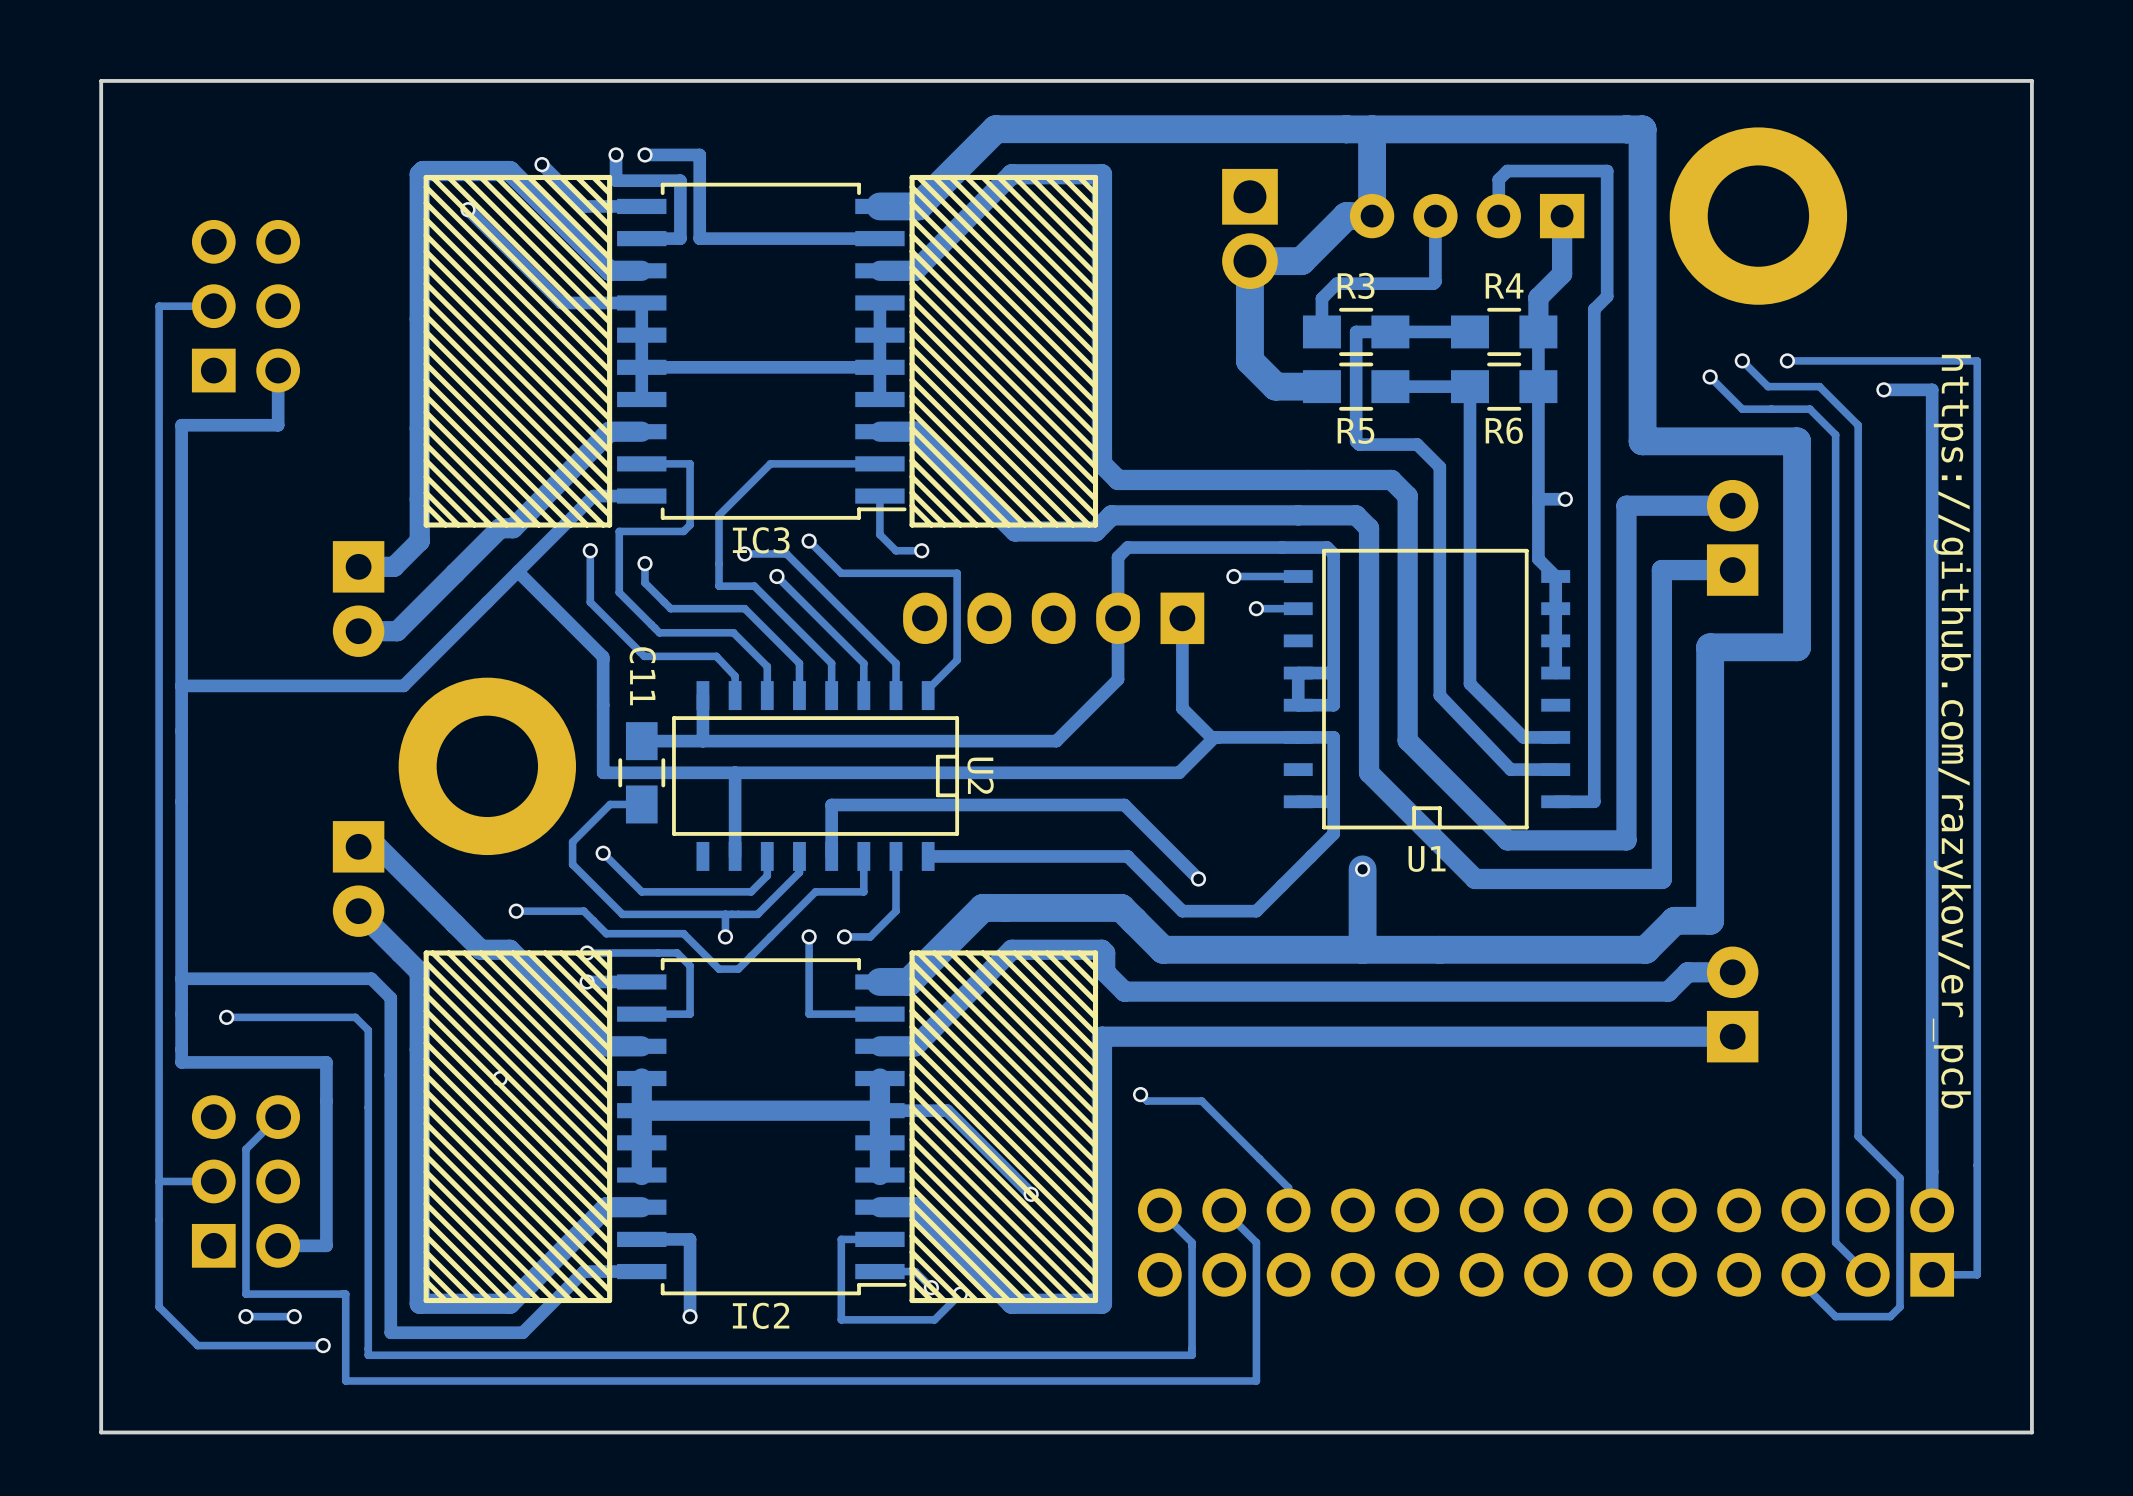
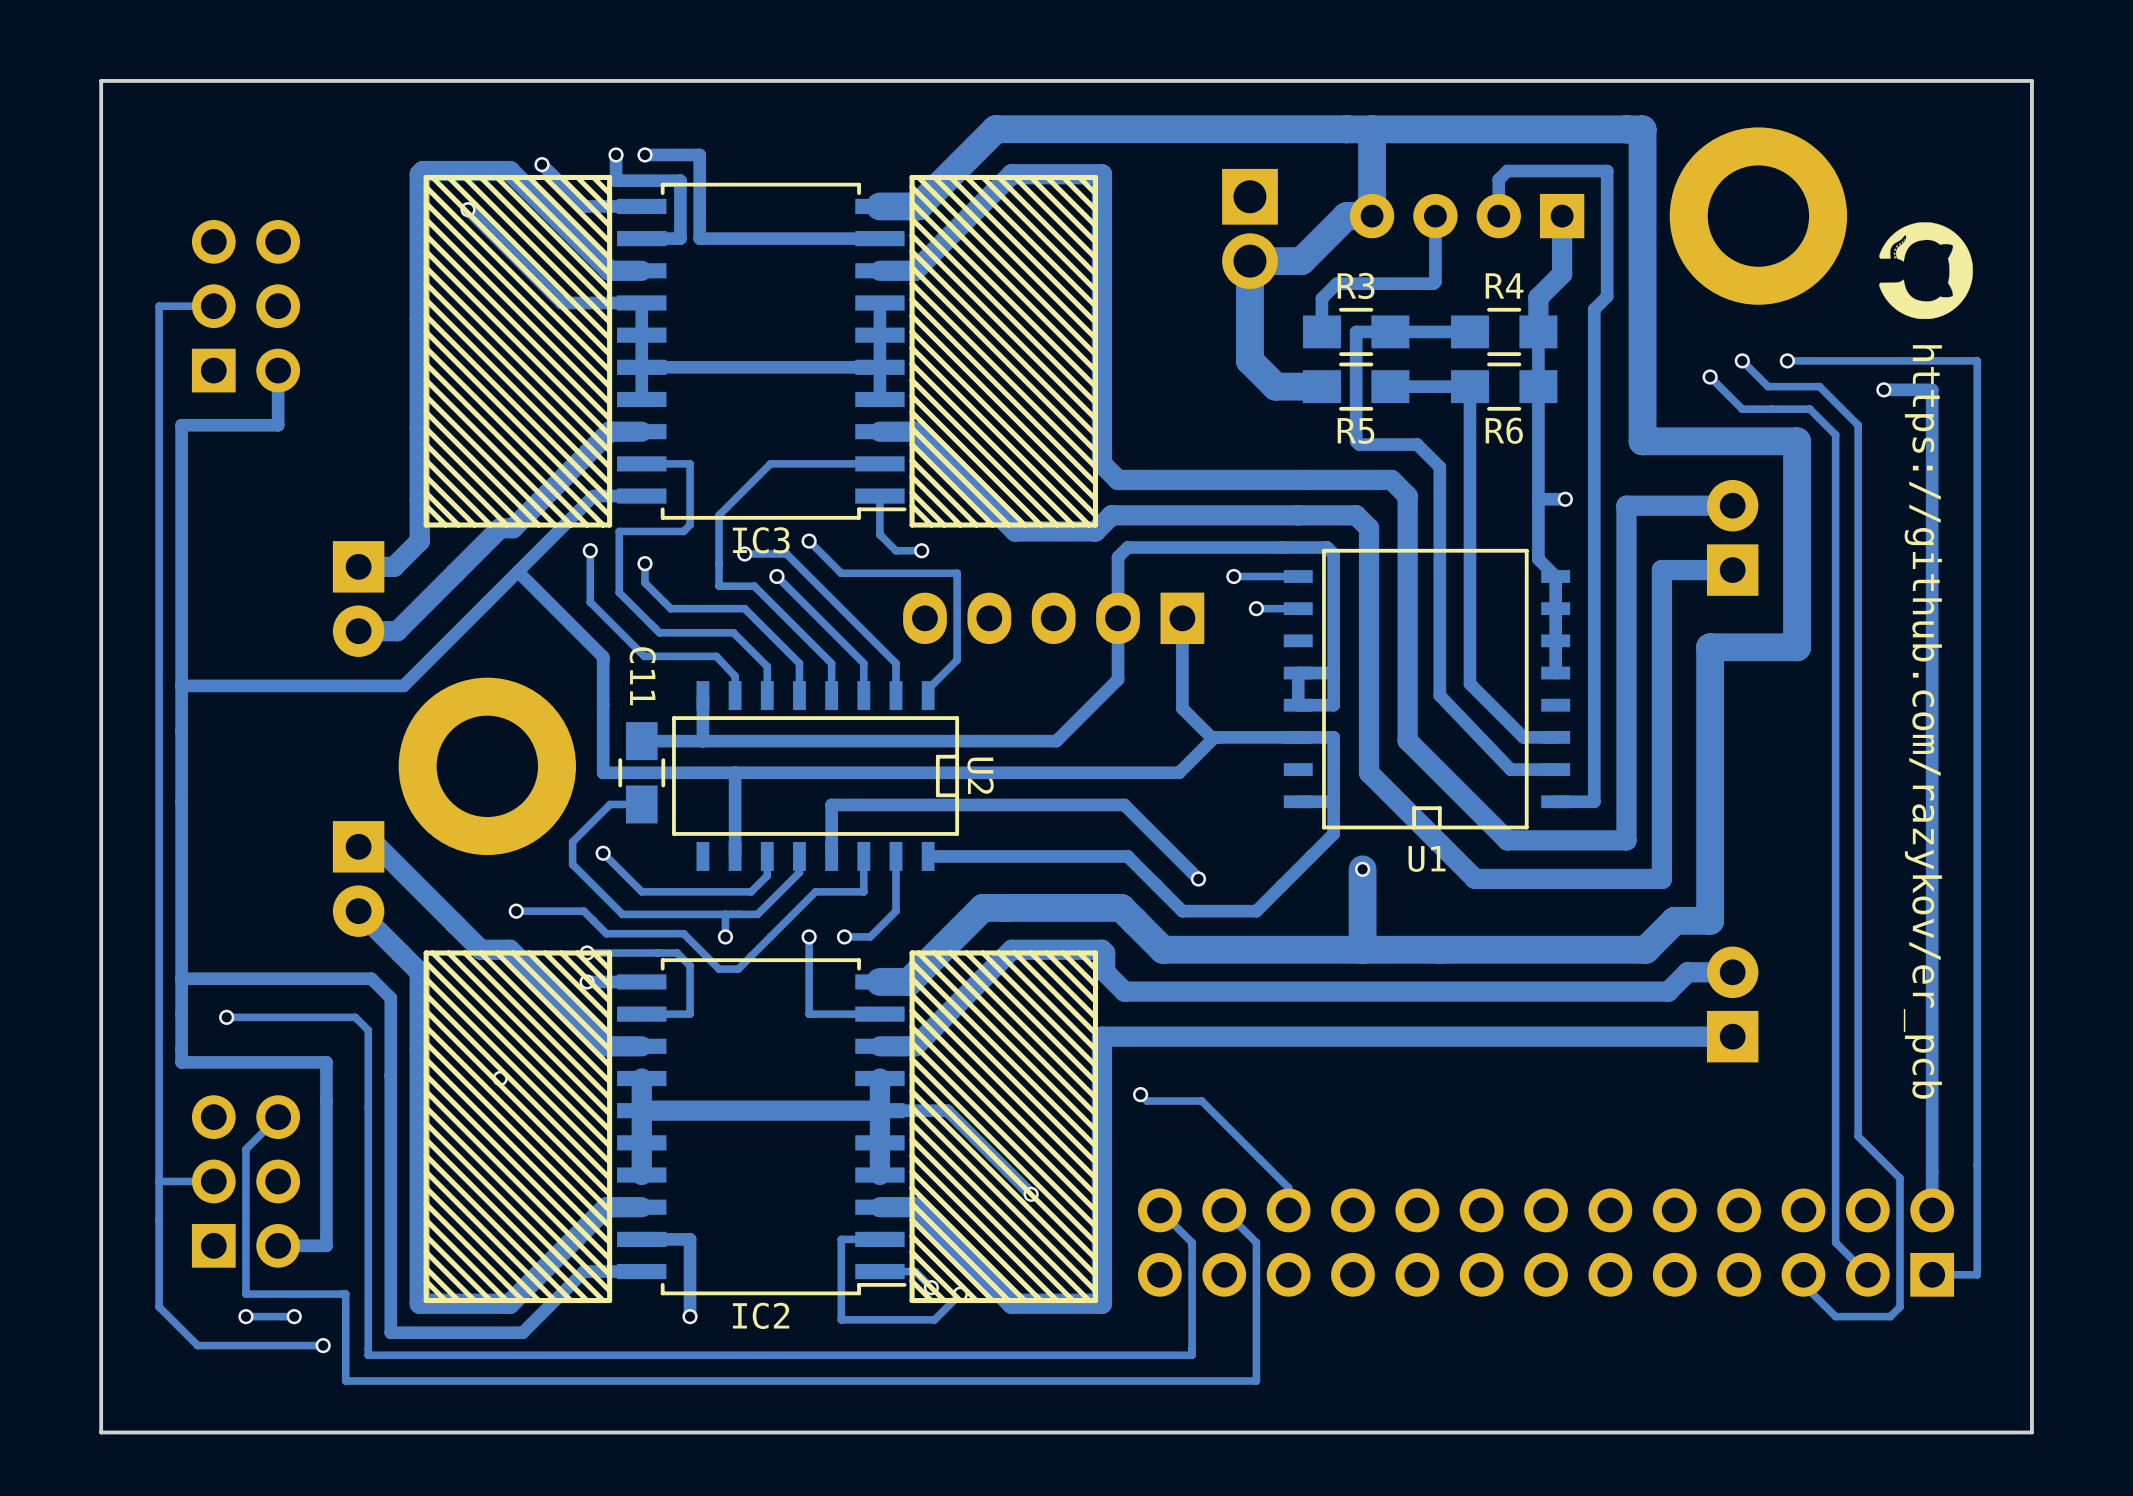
drawing: none -> [1879, 222, 1973, 320]
text position: https://github.com/razykov/er_pcb (1951, 731) -> https://github.com/razykov/er_pcb (1922, 722)

